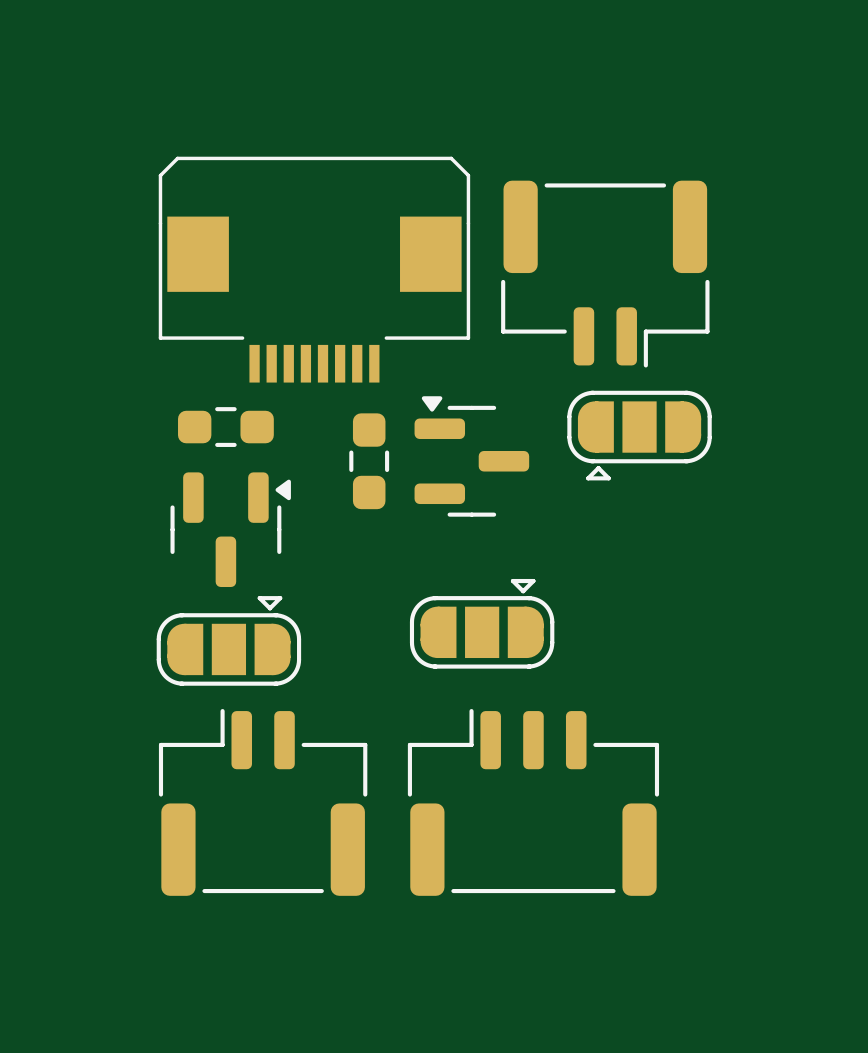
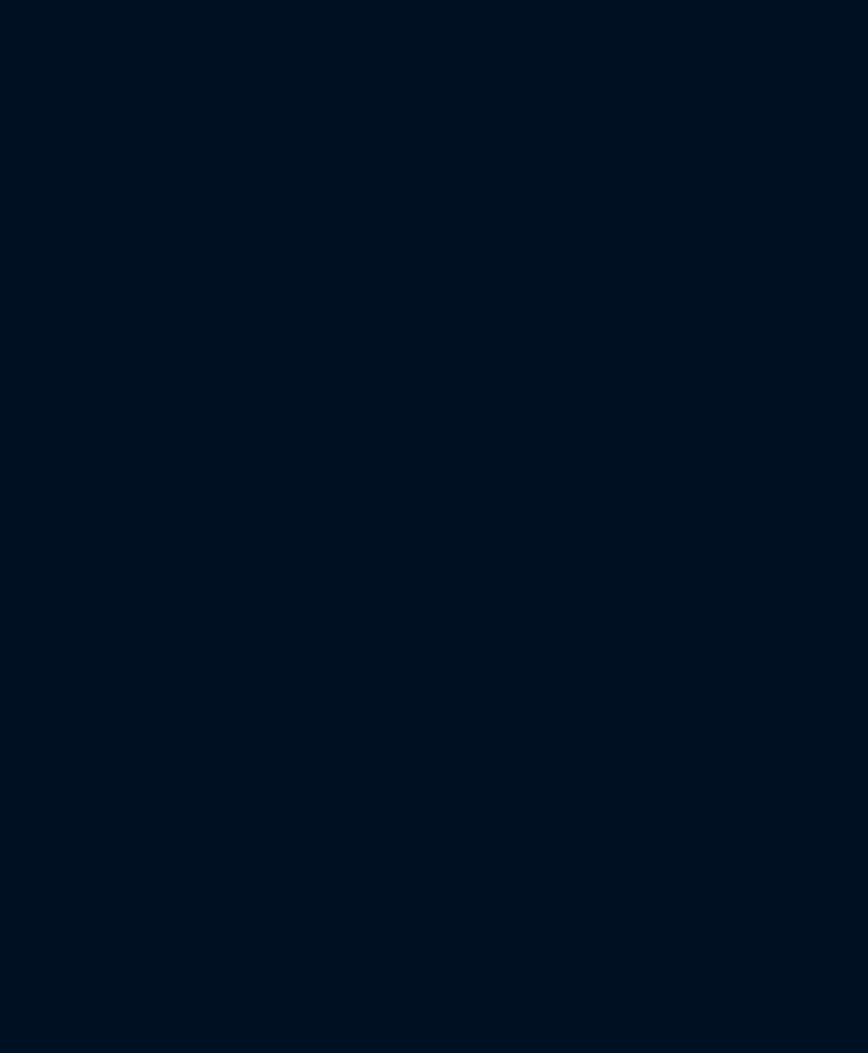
part: (314, 269) -> none
part: (605, 274) -> none
part: (225, 427) -> none
part: (639, 435) -> none
part: (471, 456) -> none
part: (369, 461) -> none
part: (230, 529) -> none
part: (482, 623) -> none
part: (228, 640) -> none
part: (263, 802) -> none
part: (533, 802) -> none

